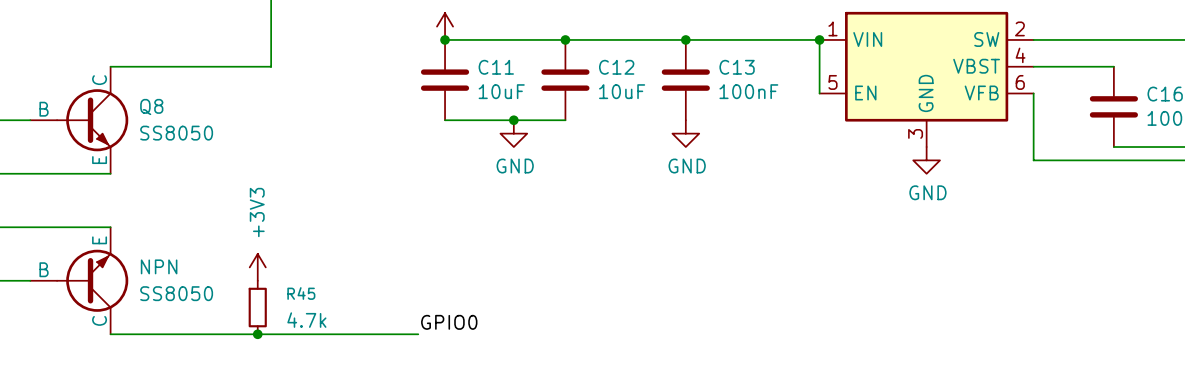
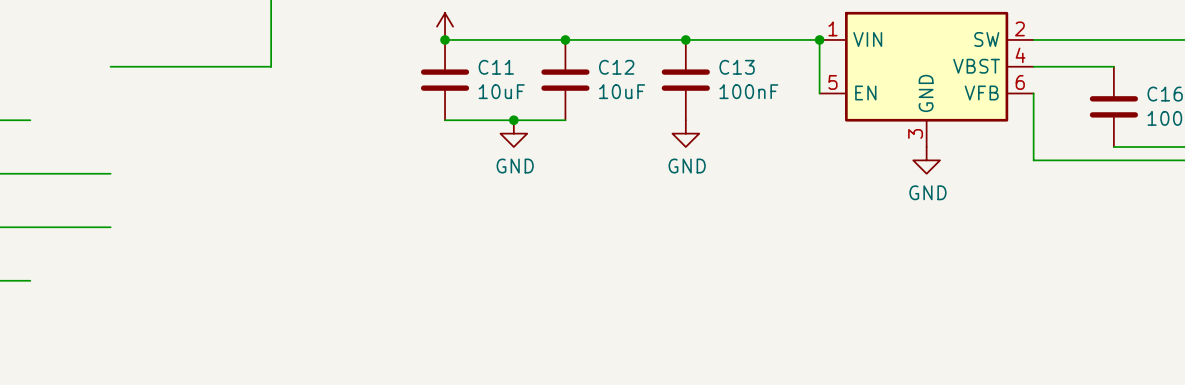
Q8: SS8050 (79, 120) -> none
power symbol: +3V3 (257, 267) -> none
SS8050: NPN (79, 280) -> none
R45: 4.7k (257, 307) -> none
label: GPIO0 (449, 322) -> none
wire: (110, 334) (418, 334) -> none
junction: (257, 334) -> none

